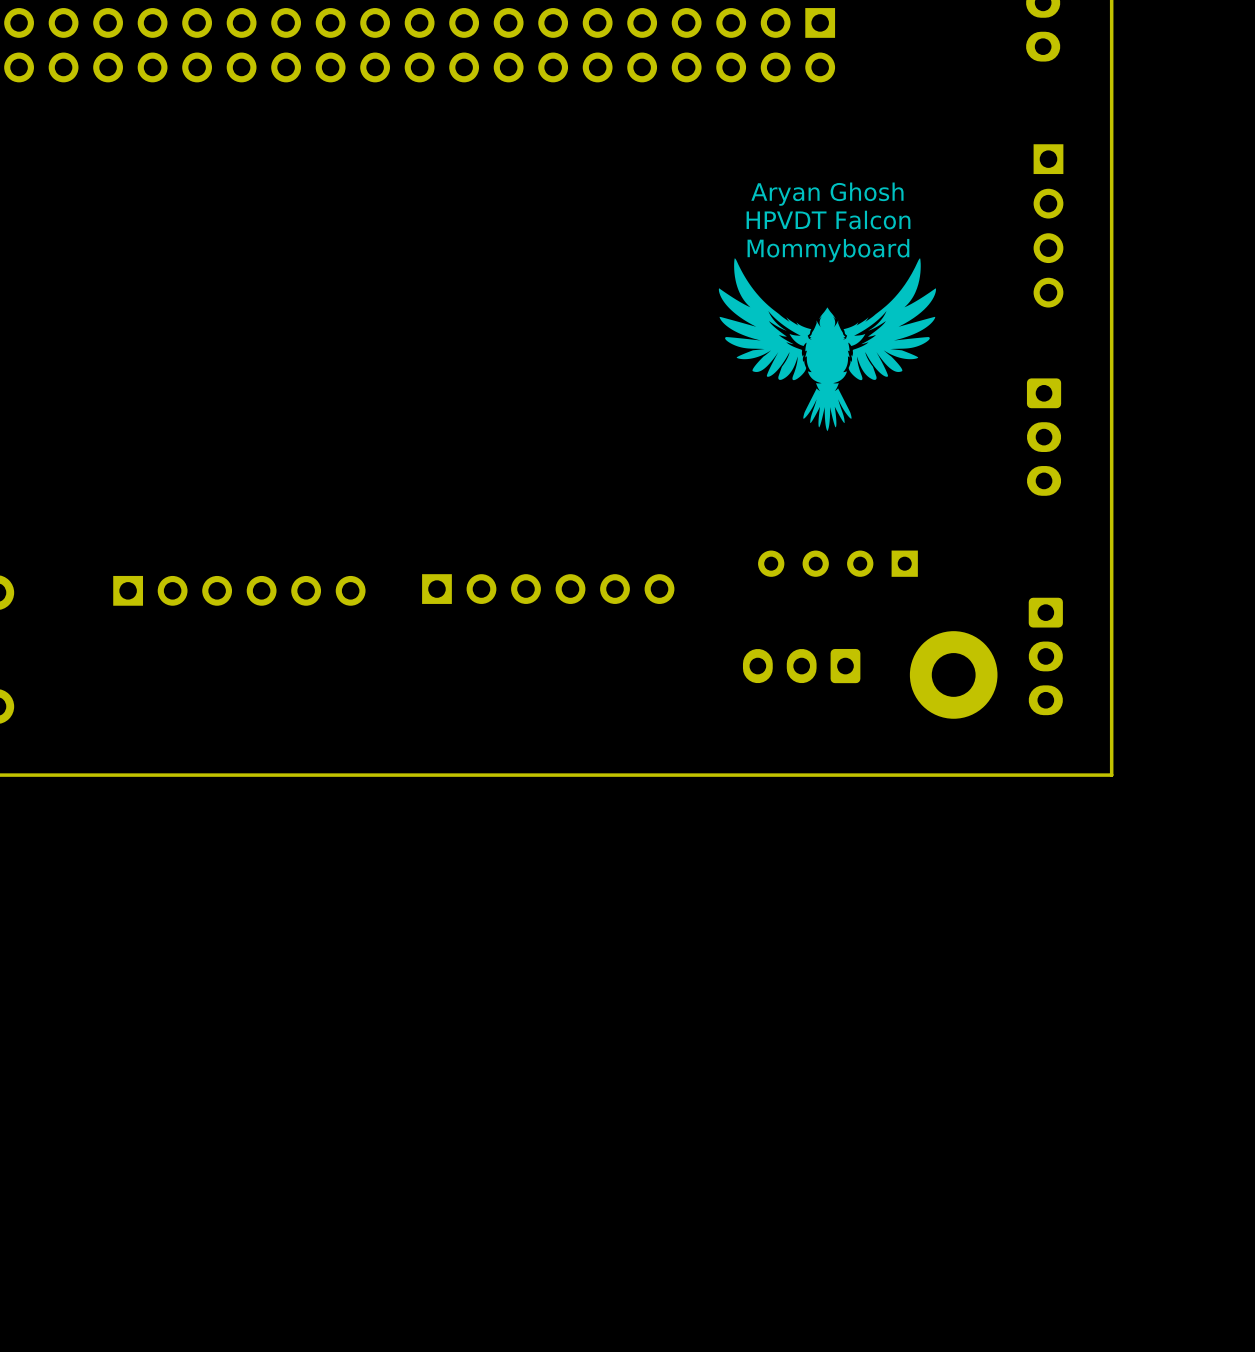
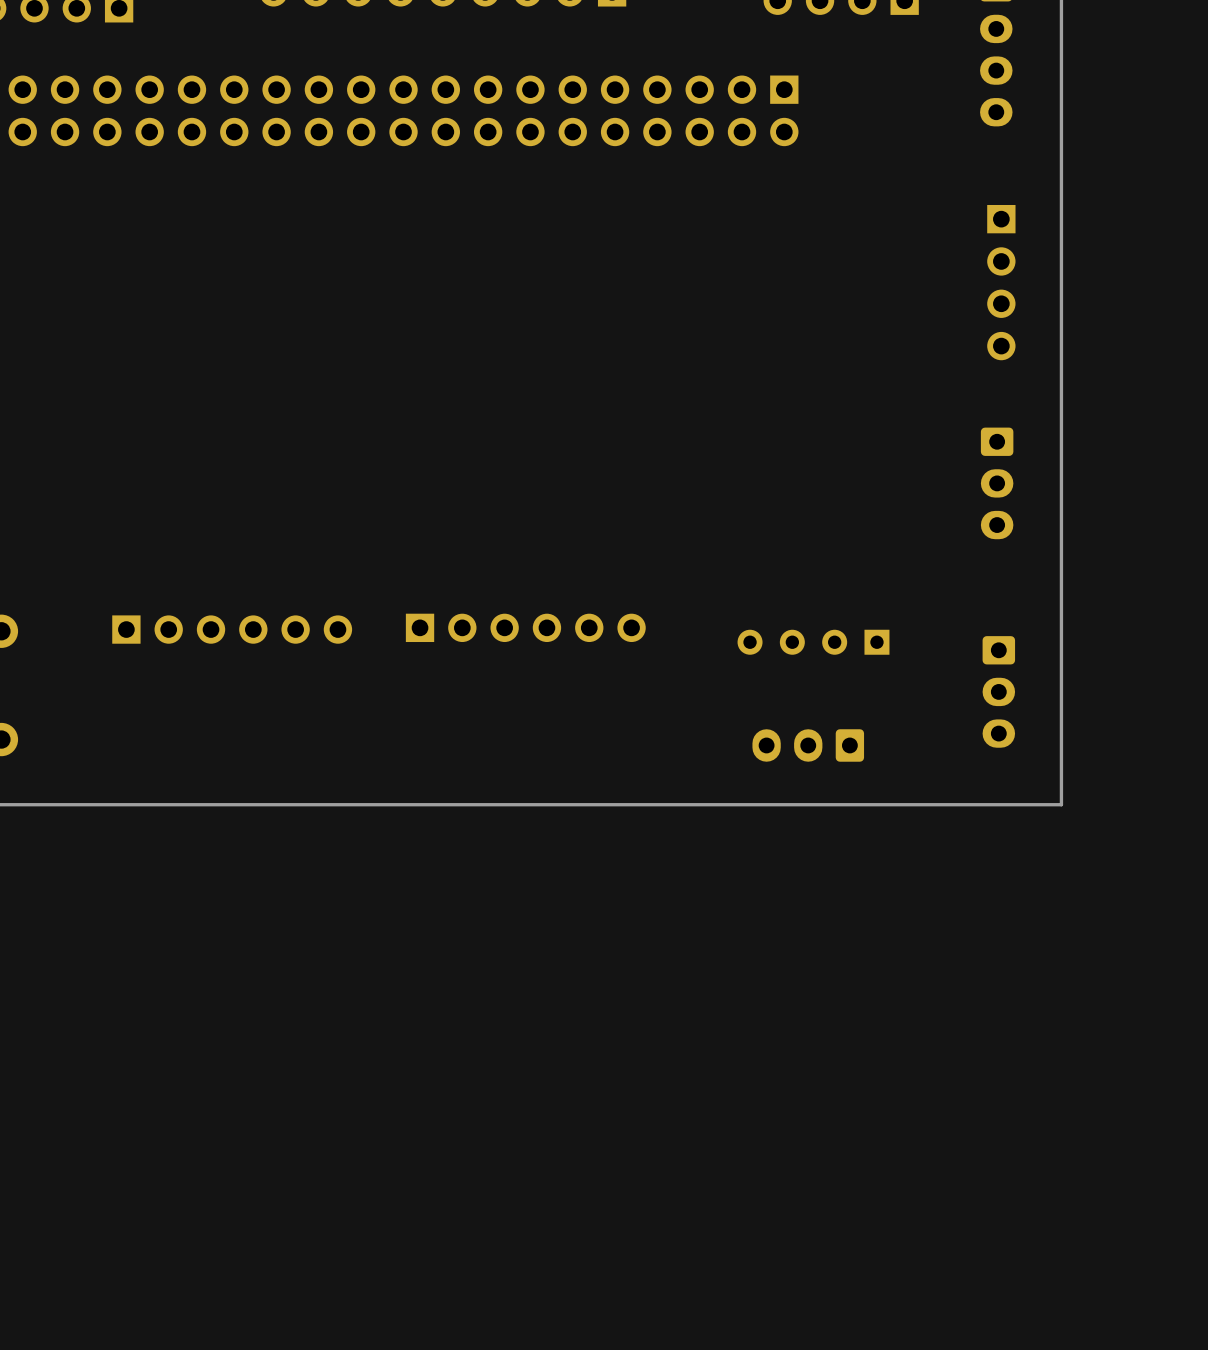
text: Aryan Ghosh (827, 194) -> none
text: HPVDT Falcon (828, 220) -> none
text: Mommyboard (828, 250) -> none
drawing: [718, 258, 936, 432] -> none
part position: (837, 563) -> (813, 642)
part position: (801, 666) -> (808, 745)
part: (953, 674) -> none

